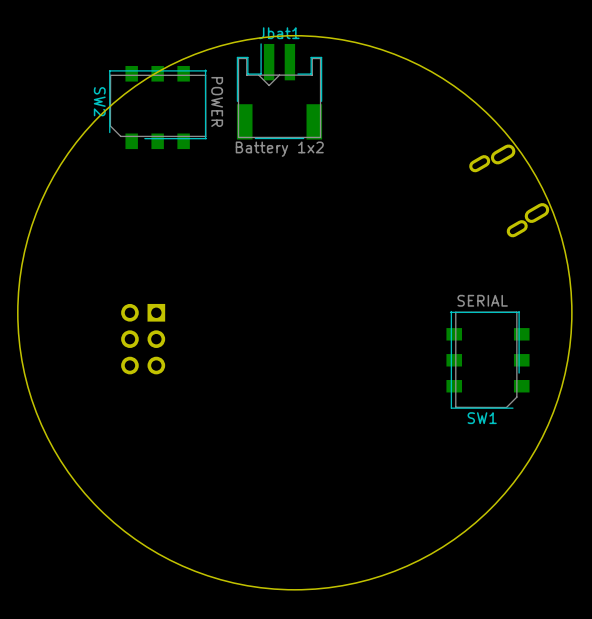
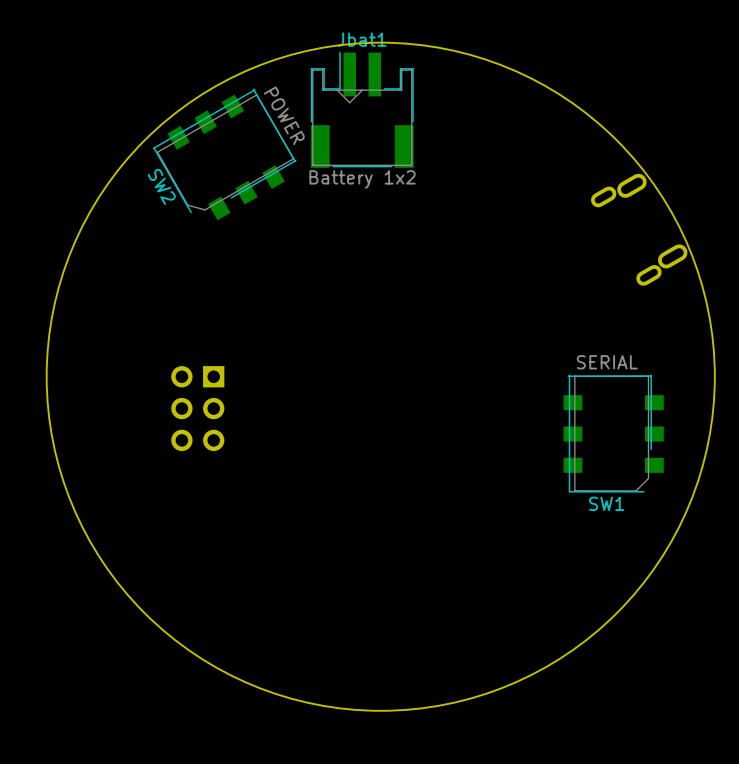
SW2 rotation: 0° (158, 107) -> 30° counterclockwise (224, 154)

